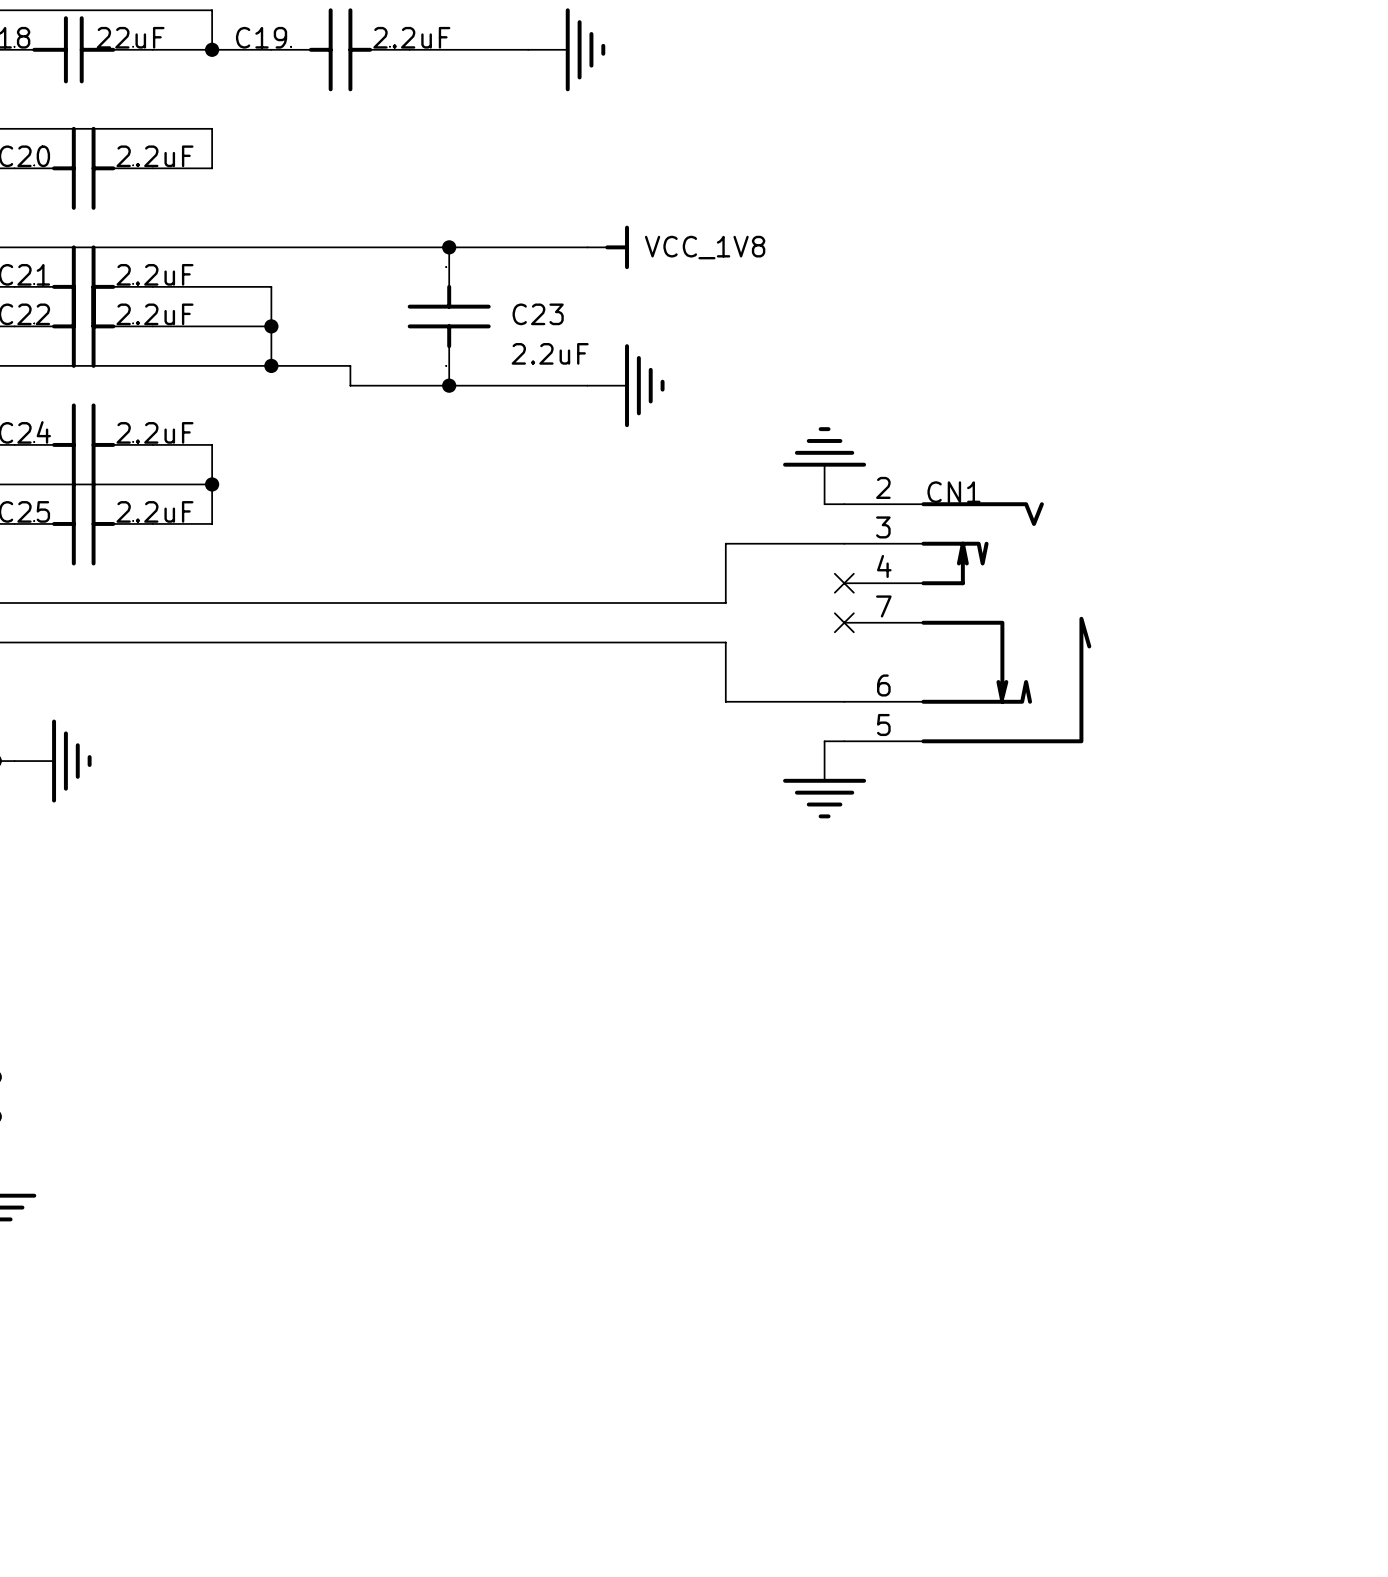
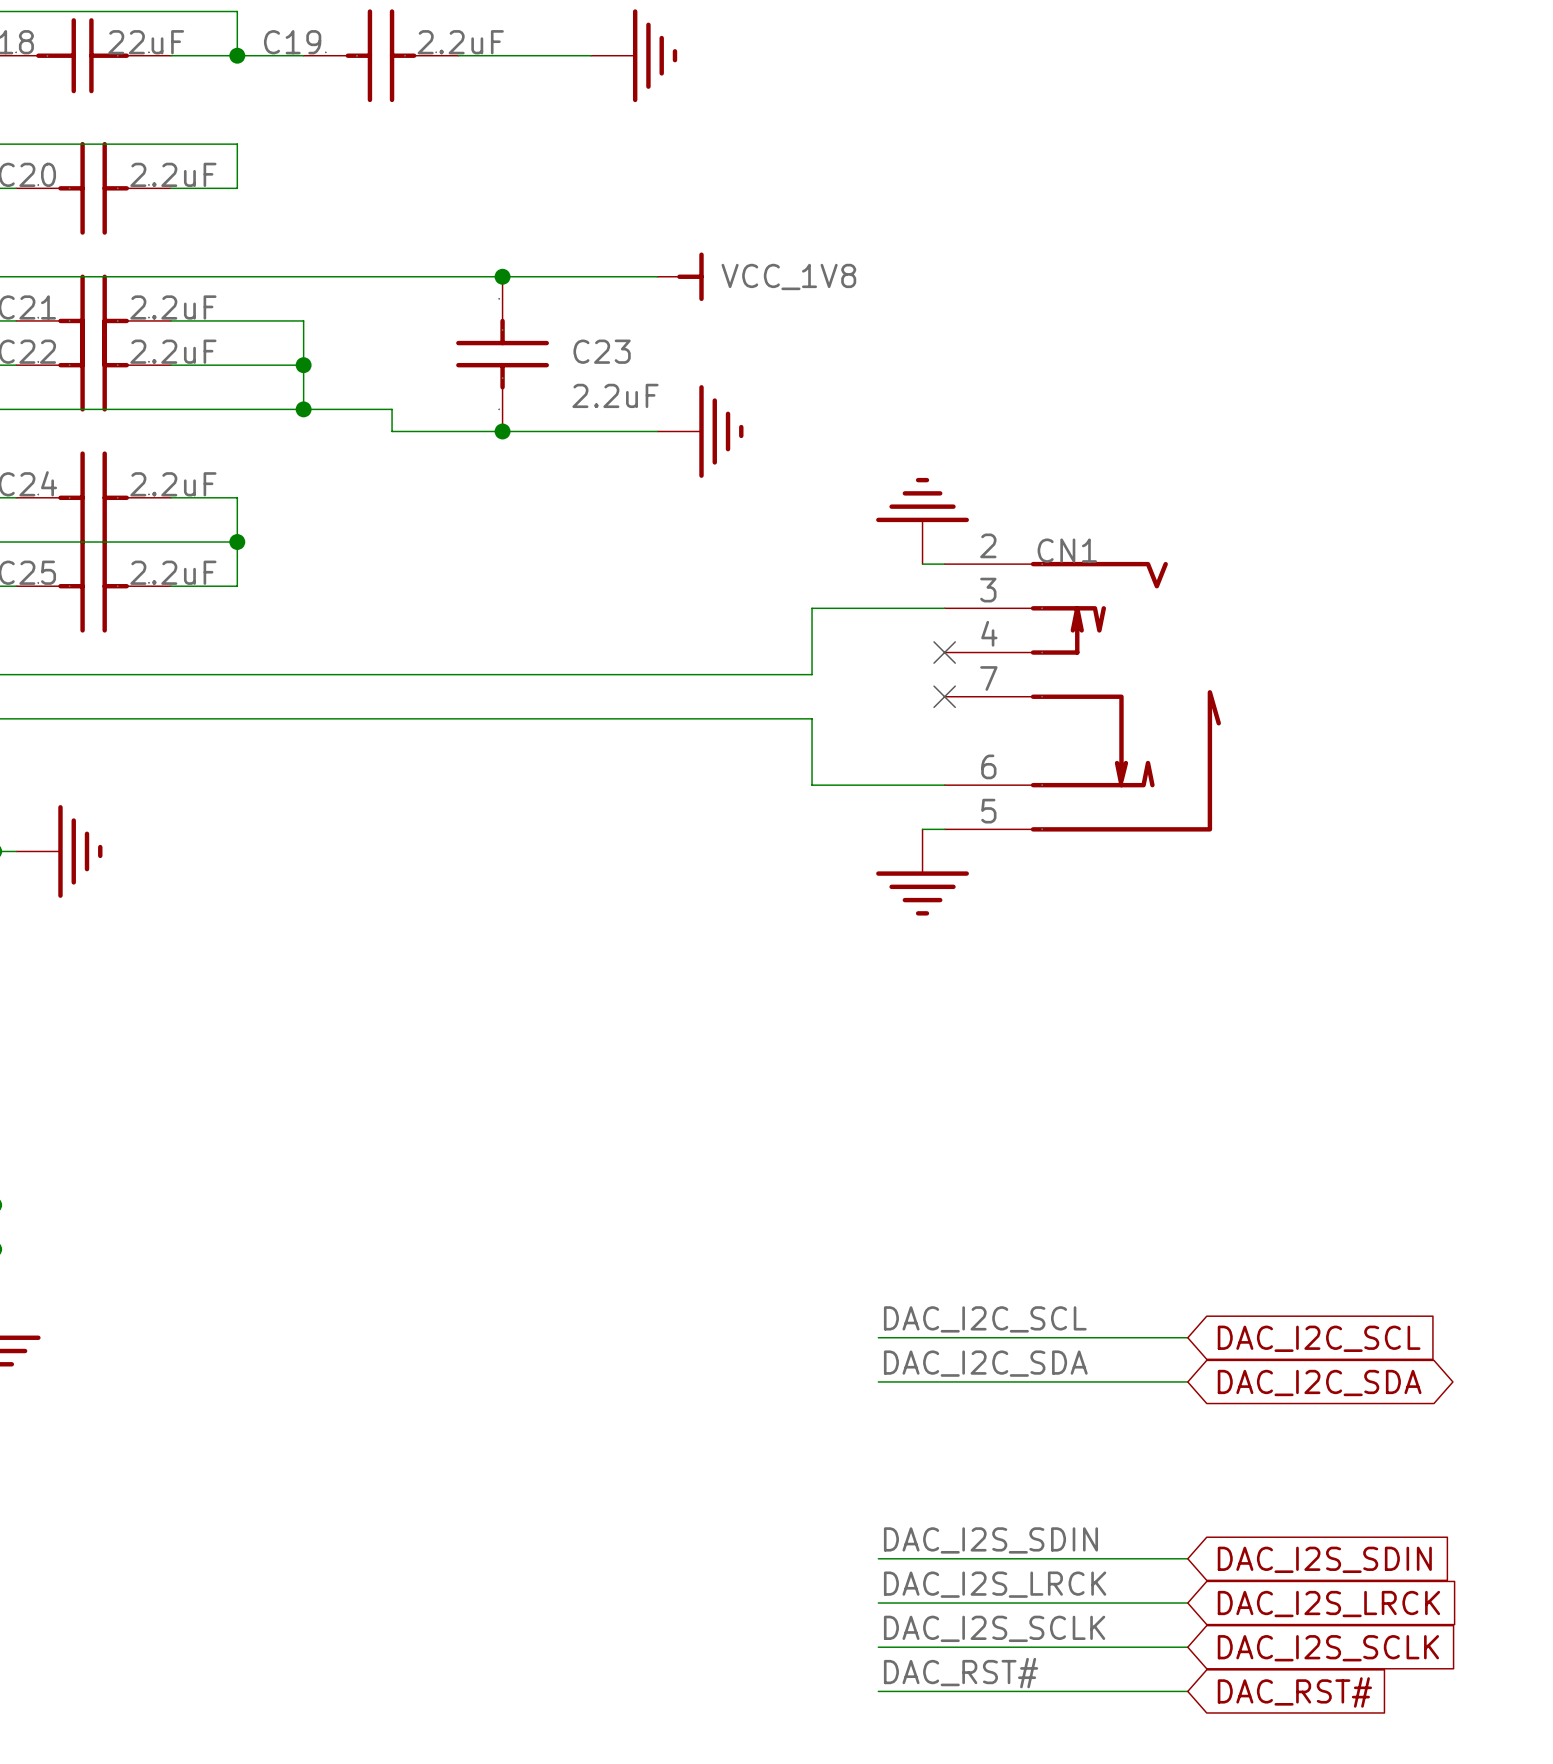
label: none -> DAC_I2C_SCL (985, 1319)
wire: none -> (878, 1337) (1187, 1337)
global label: none -> DAC_I2C_SCL (1319, 1338)
label: none -> DAC_I2C_SDA (985, 1363)
wire: none -> (878, 1381) (1187, 1381)
global label: none -> DAC_I2C_SDA (1319, 1383)
label: none -> DAC_I2S_SDIN (990, 1540)
wire: none -> (878, 1558) (1187, 1558)
global label: none -> DAC_I2S_SDIN (1324, 1559)
label: none -> DAC_I2S_LRCK (995, 1584)
wire: none -> (878, 1603) (1187, 1603)
global label: none -> DAC_I2S_LRCK (1328, 1604)
label: none -> DAC_I2S_SCLK (994, 1628)
wire: none -> (878, 1647) (1187, 1647)
global label: none -> DAC_I2S_SCLK (1328, 1648)
label: none -> DAC_RST# (961, 1673)
wire: none -> (878, 1691) (1187, 1691)
global label: none -> DAC_RST# (1294, 1692)

